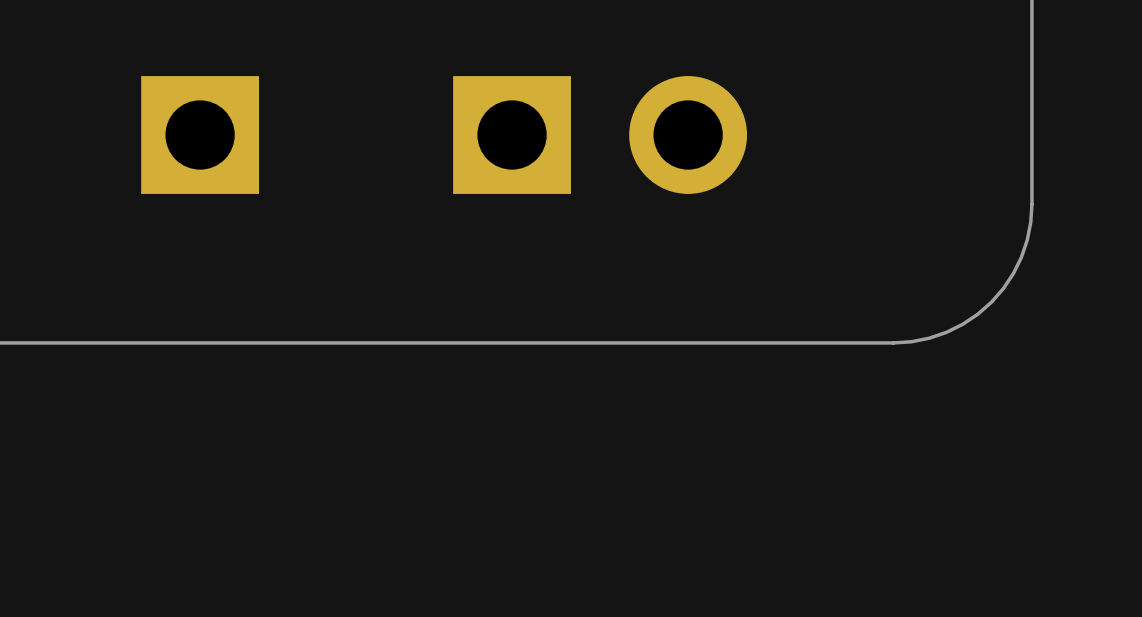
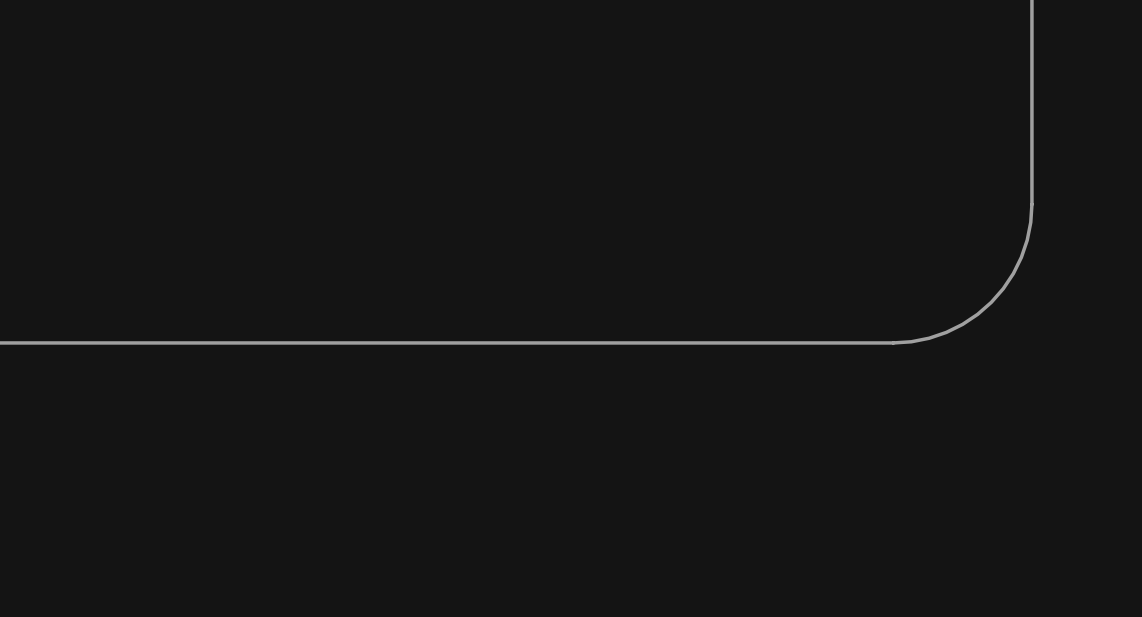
part: (200, 134) -> none
part: (600, 134) -> none

